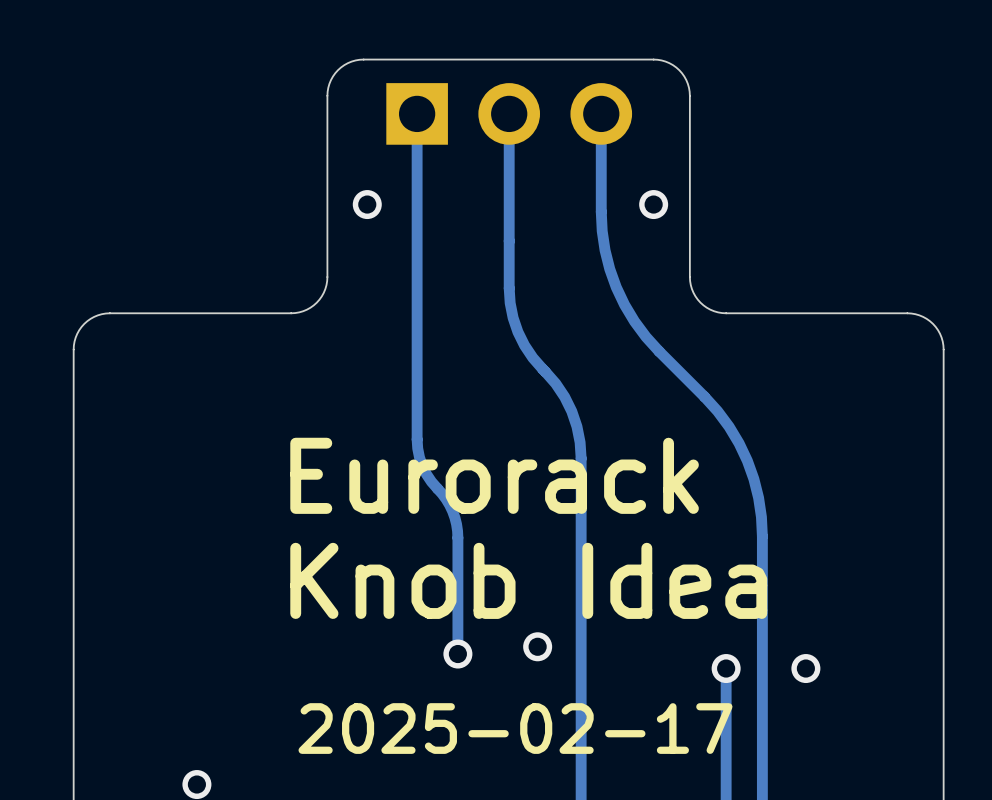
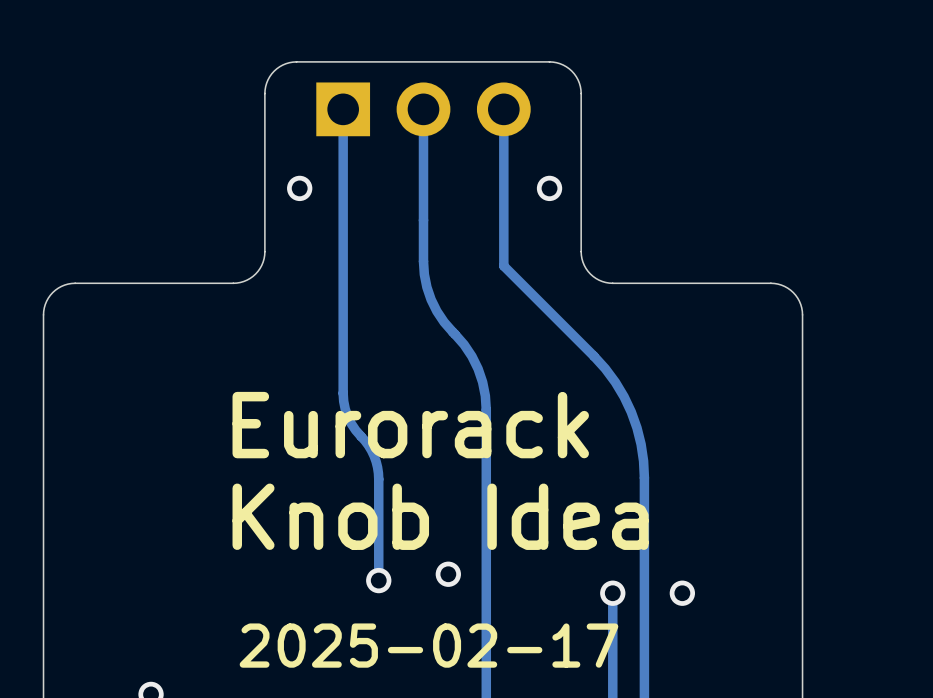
track: (601, 211) (605, 250) (616, 287) (634, 321) (659, 351) -> (503, 194) (503, 266) (554, 316)

